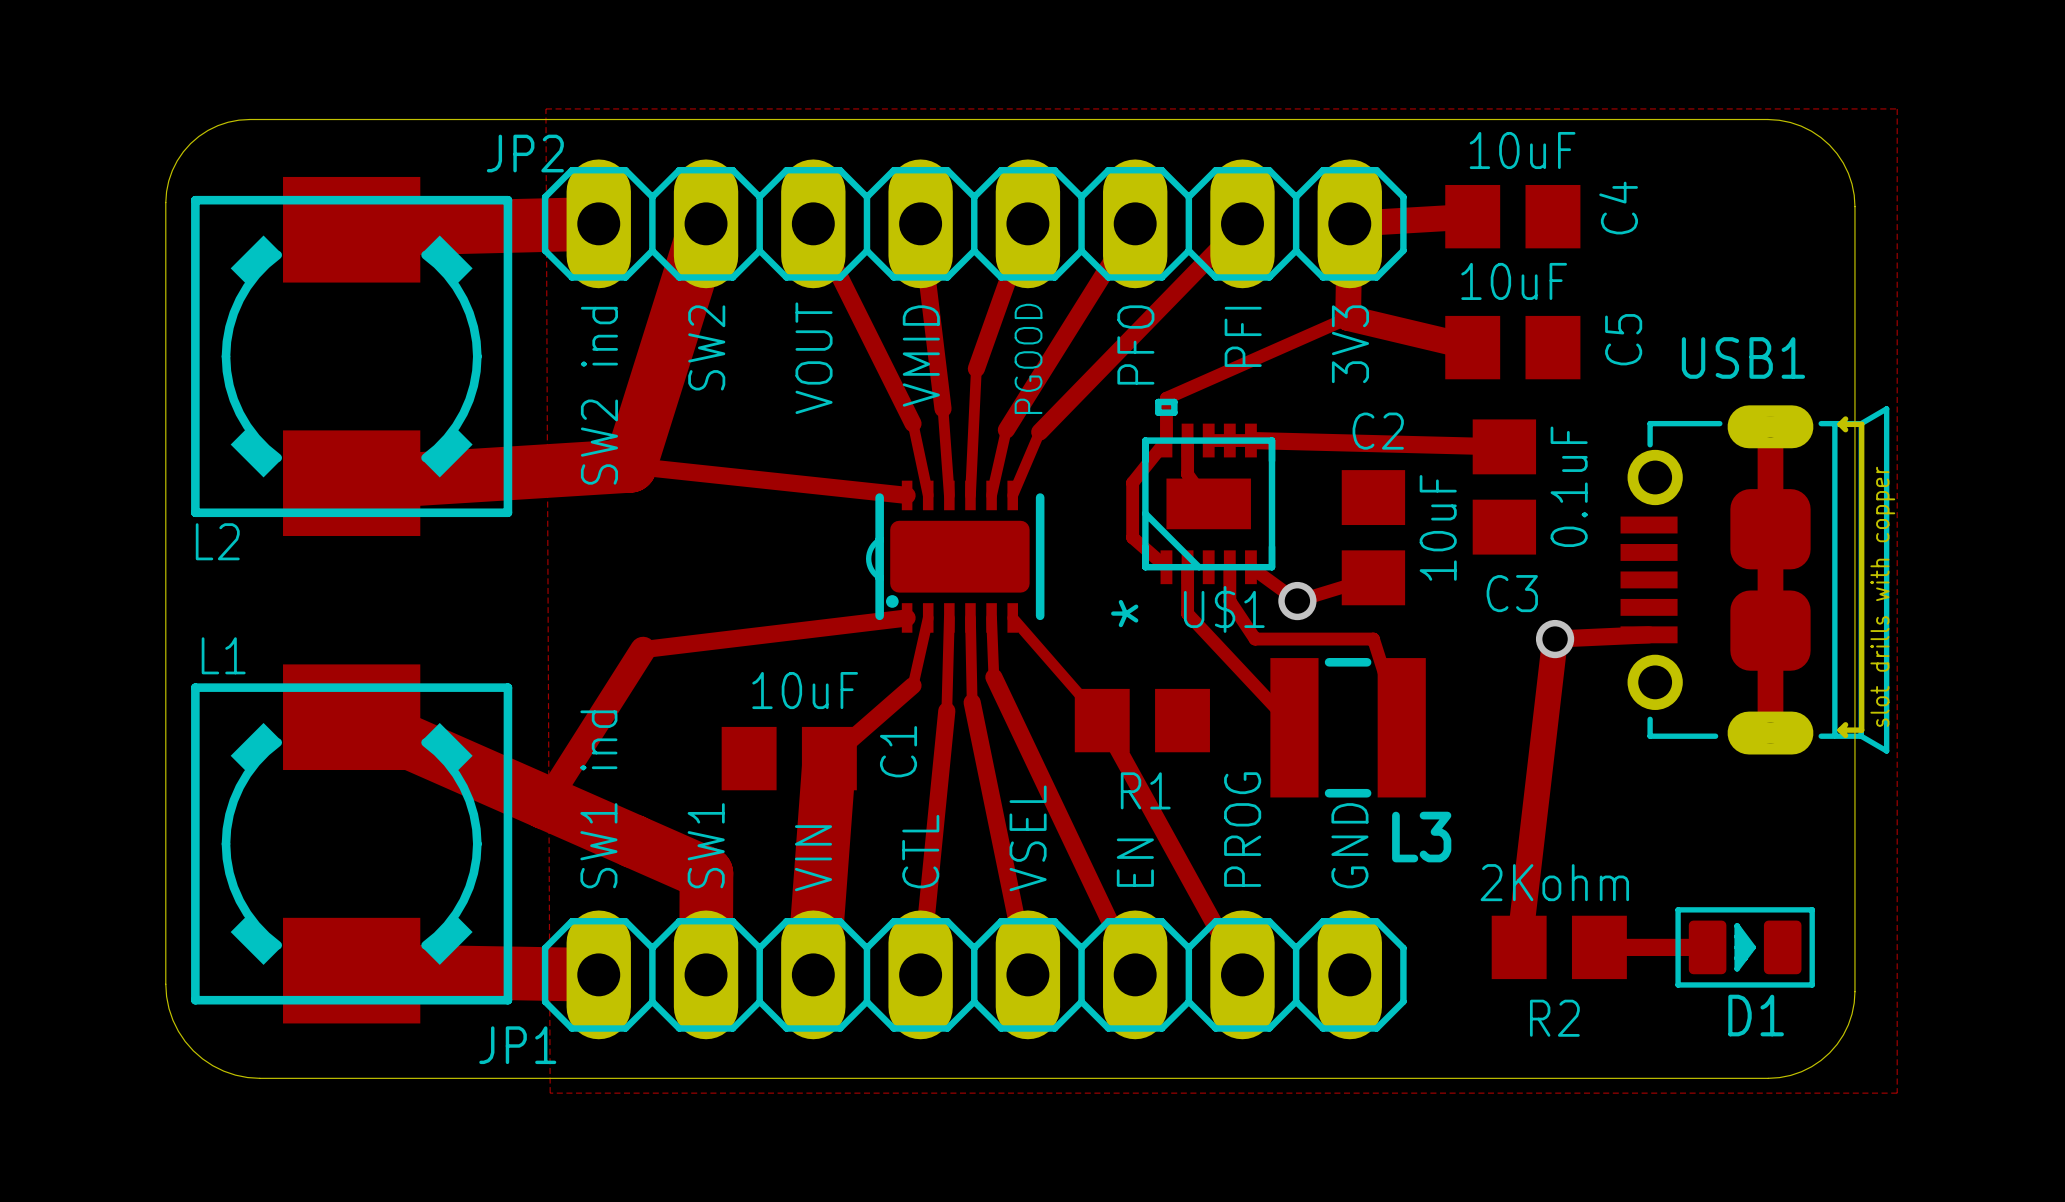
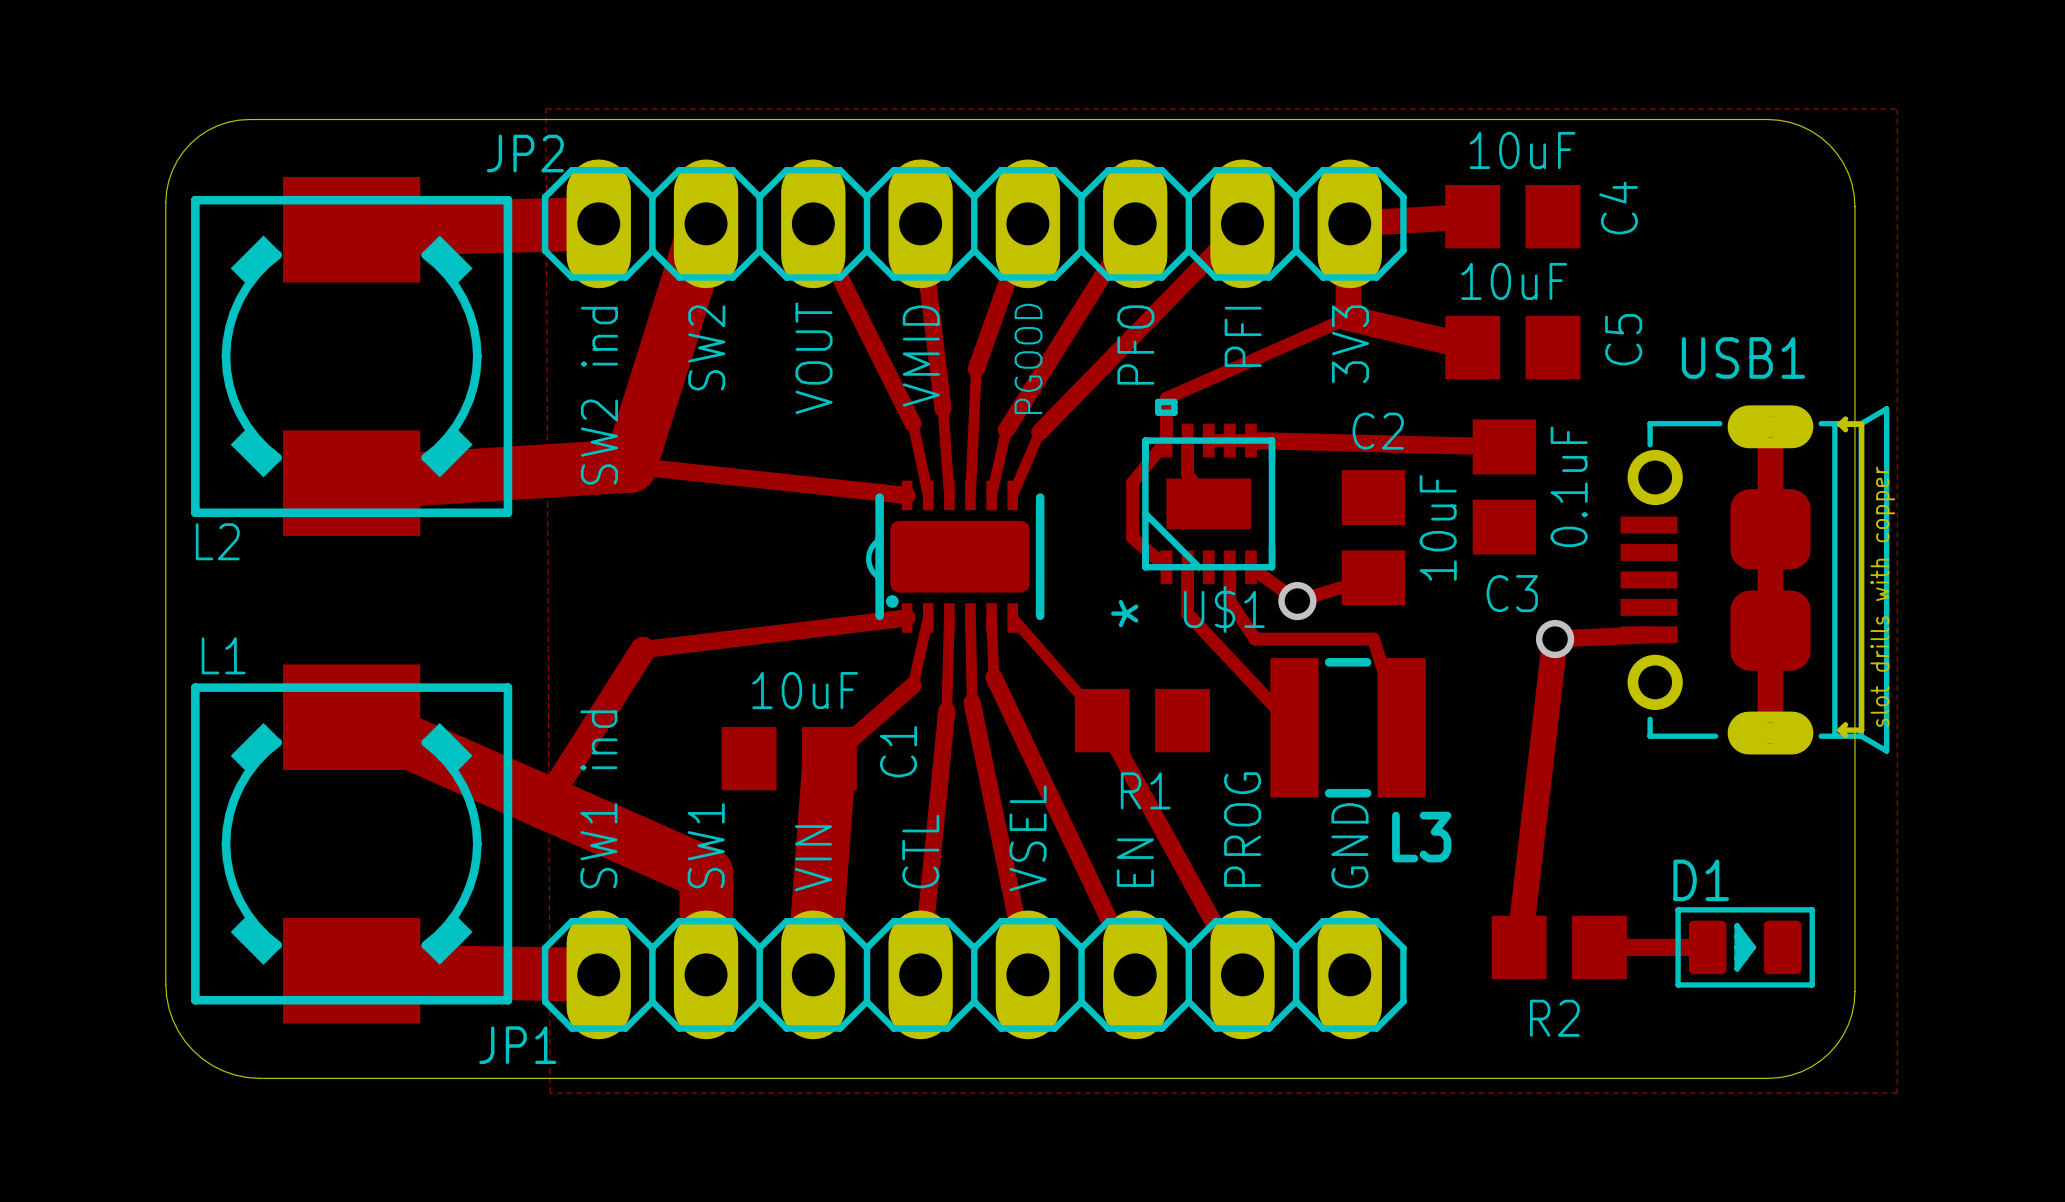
R2 value: 2Kohm (1554, 882) -> none
D1 name position: D1 (1756, 1015) -> D1 (1701, 880)

